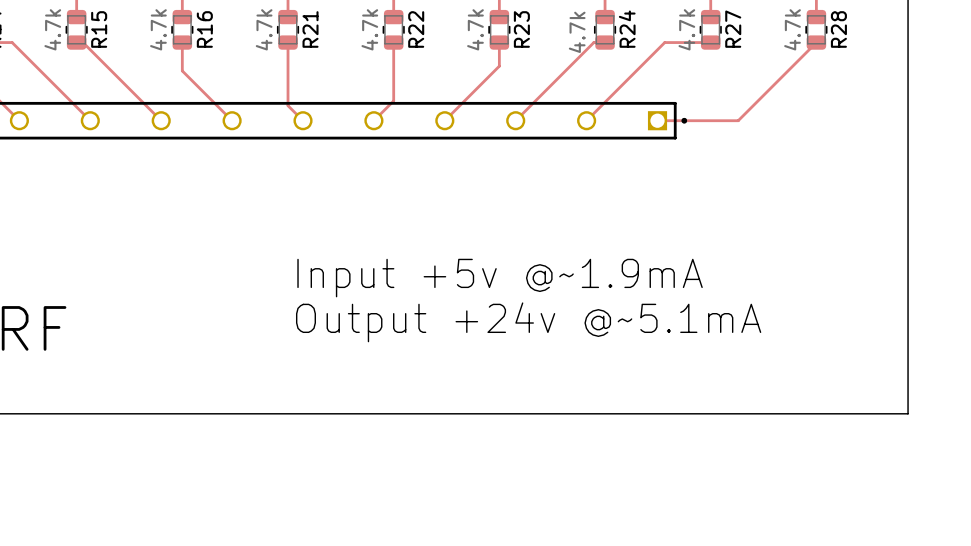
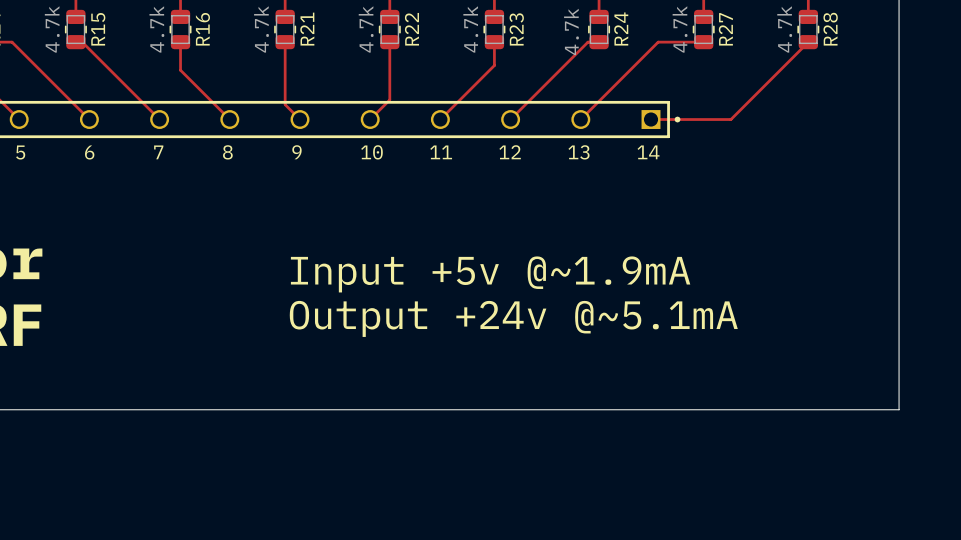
text: none -> 5 (20, 152)
text: none -> 6 (89, 152)
text: none -> 7 (158, 152)
text: none -> 8 (227, 152)
text: none -> 9 (296, 152)
text: none -> 10 (371, 152)
text: none -> 11 (441, 152)
text: none -> 12 (510, 152)
text: none -> 13 (578, 152)
text: none -> 14 (648, 152)

